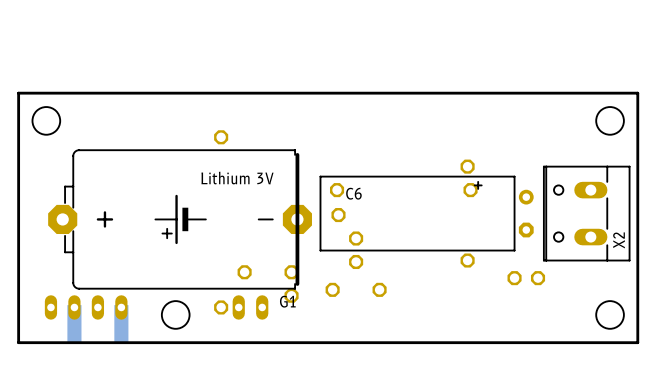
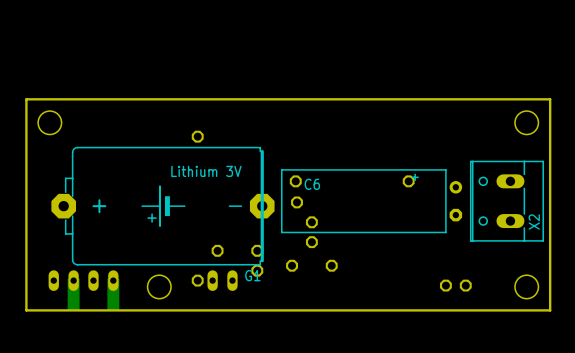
part: (467, 166) -> none
part: (467, 260) -> none
part: (514, 278) -> none
part: (538, 278) -> none
part: none -> (445, 285)
part: none -> (465, 285)

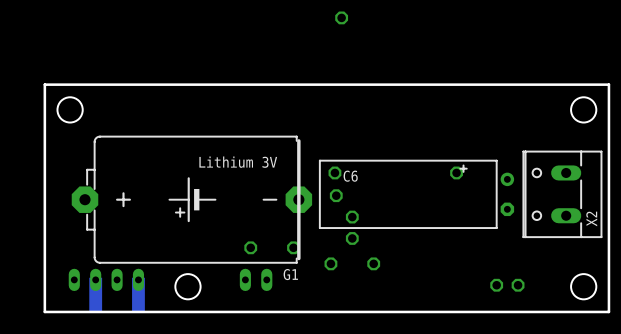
part: none -> (341, 17)
part: (197, 136) -> none
part: (257, 270) -> none
part: (197, 280) -> none

